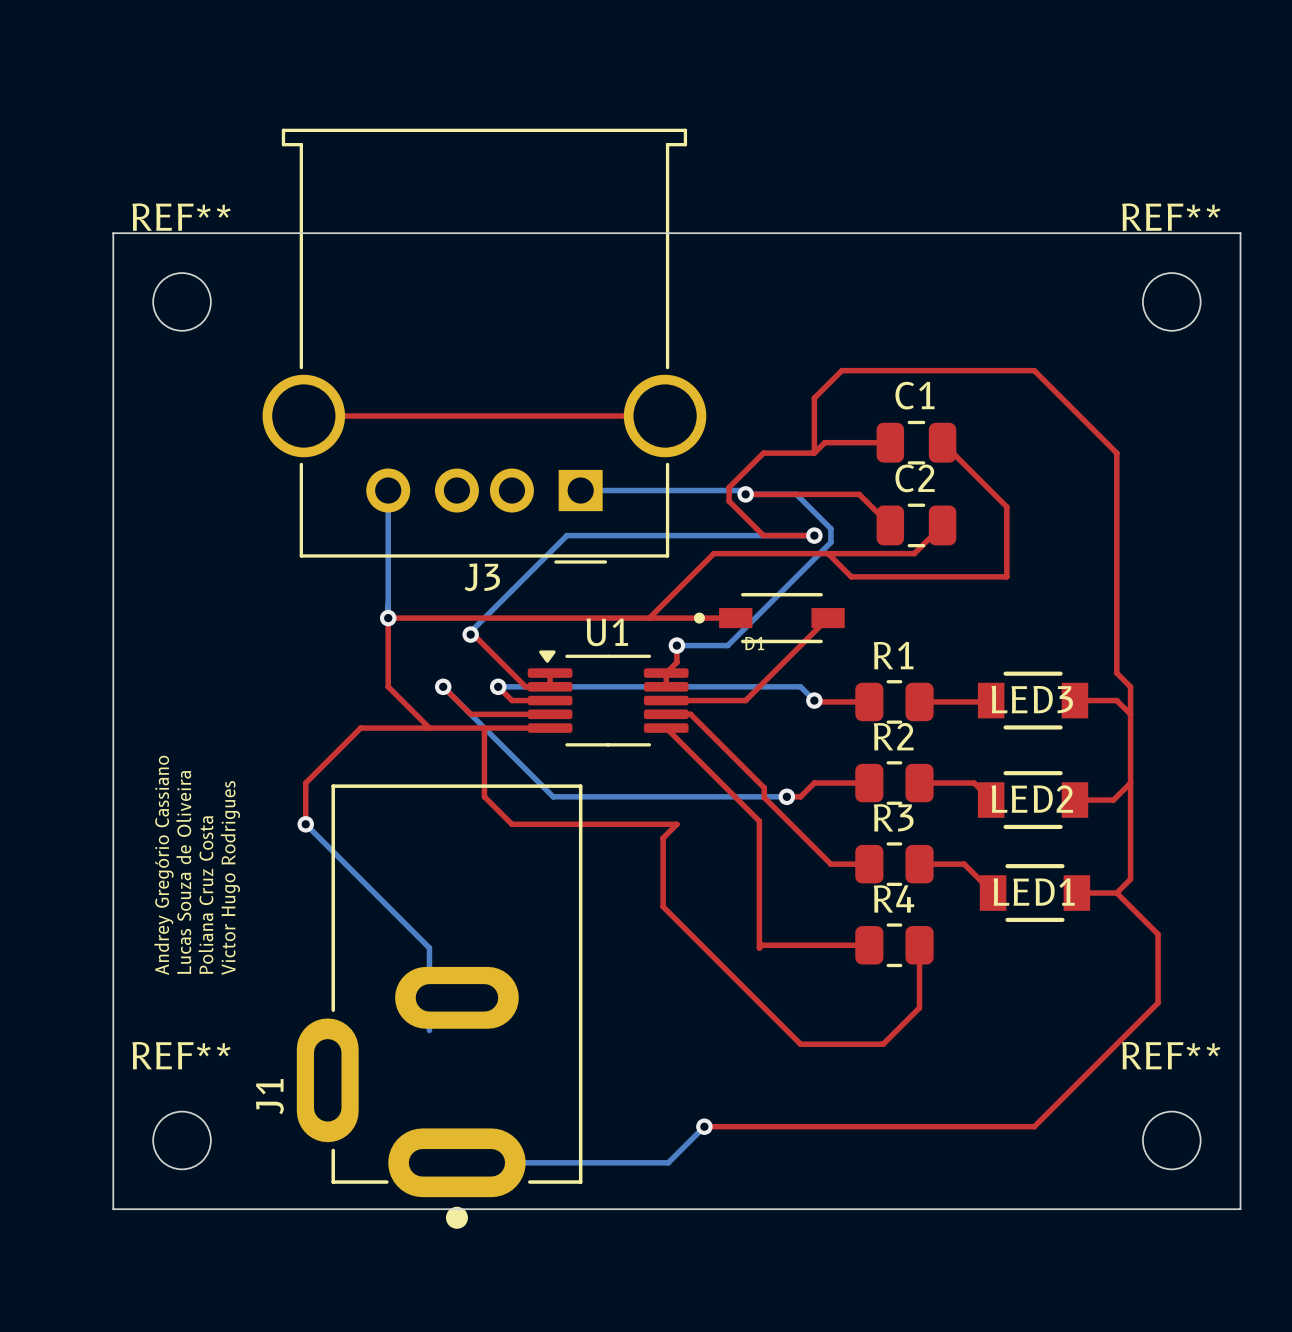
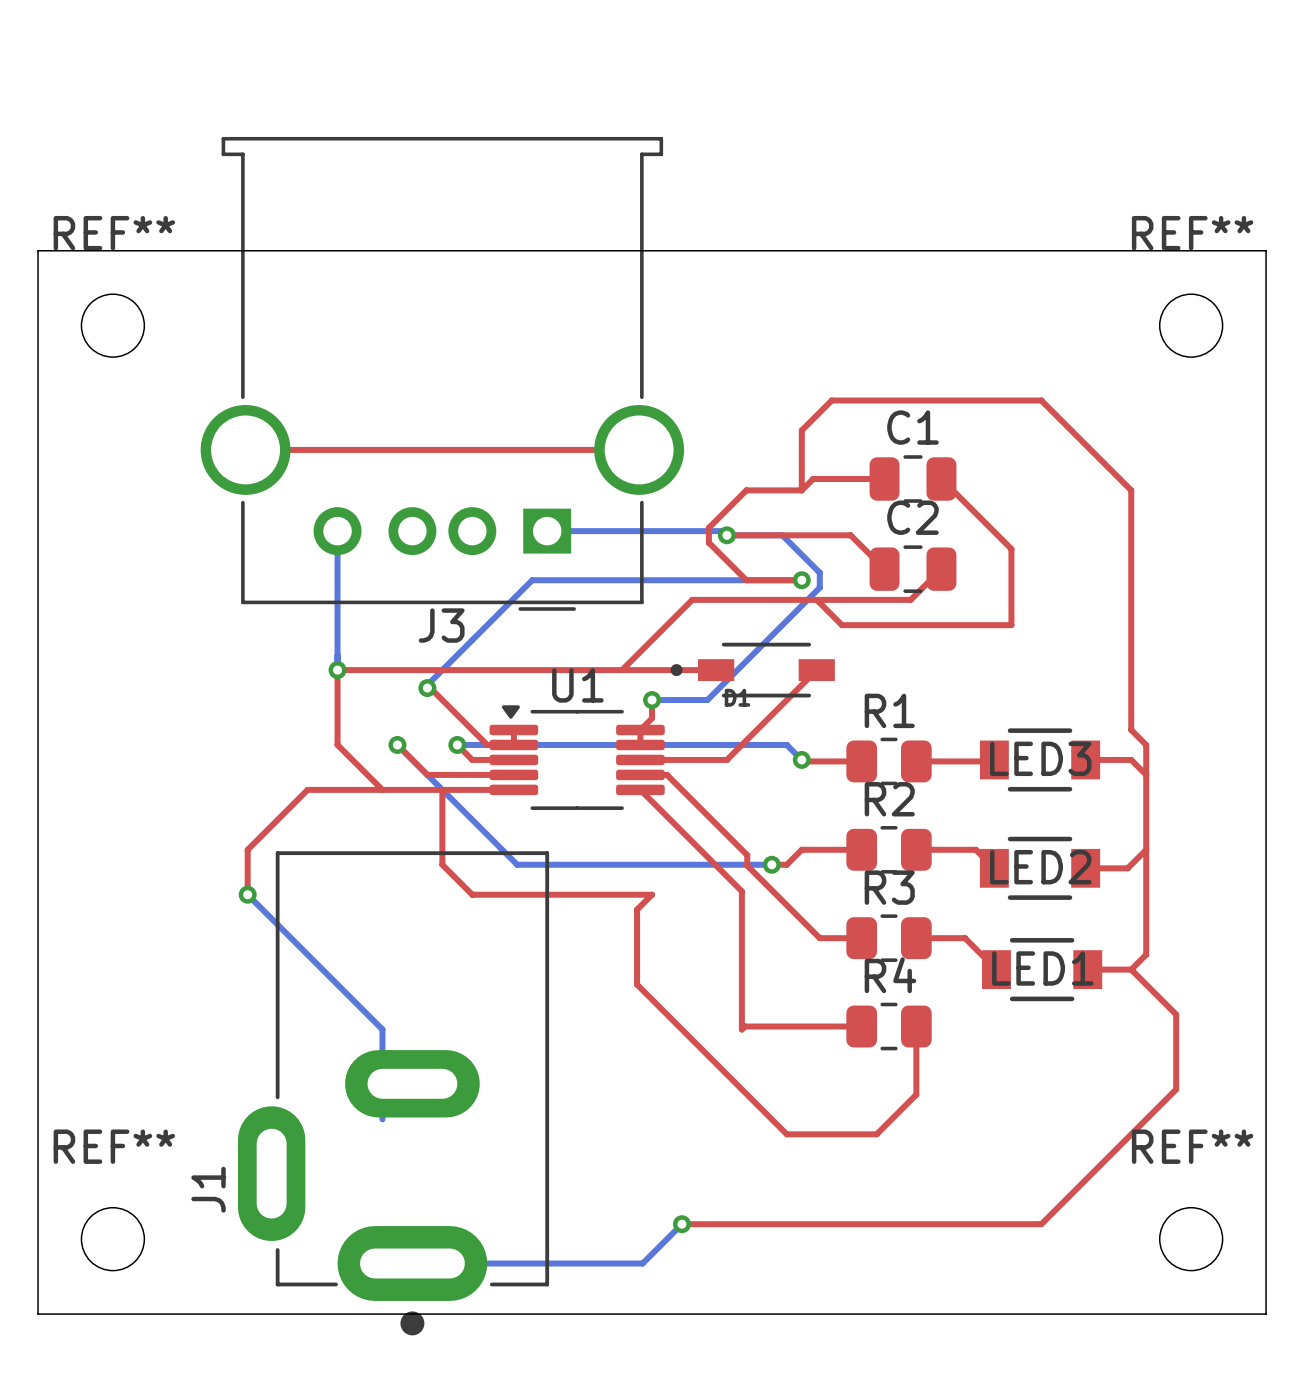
text: Andrey Gregório Cassiano (163, 865) -> none
text: Lucas Souza de Oliveira (183, 872) -> none
text: Victor Hugo Rodrigues (230, 877) -> none
text: Poliana Cruz Costa (205, 895) -> none

